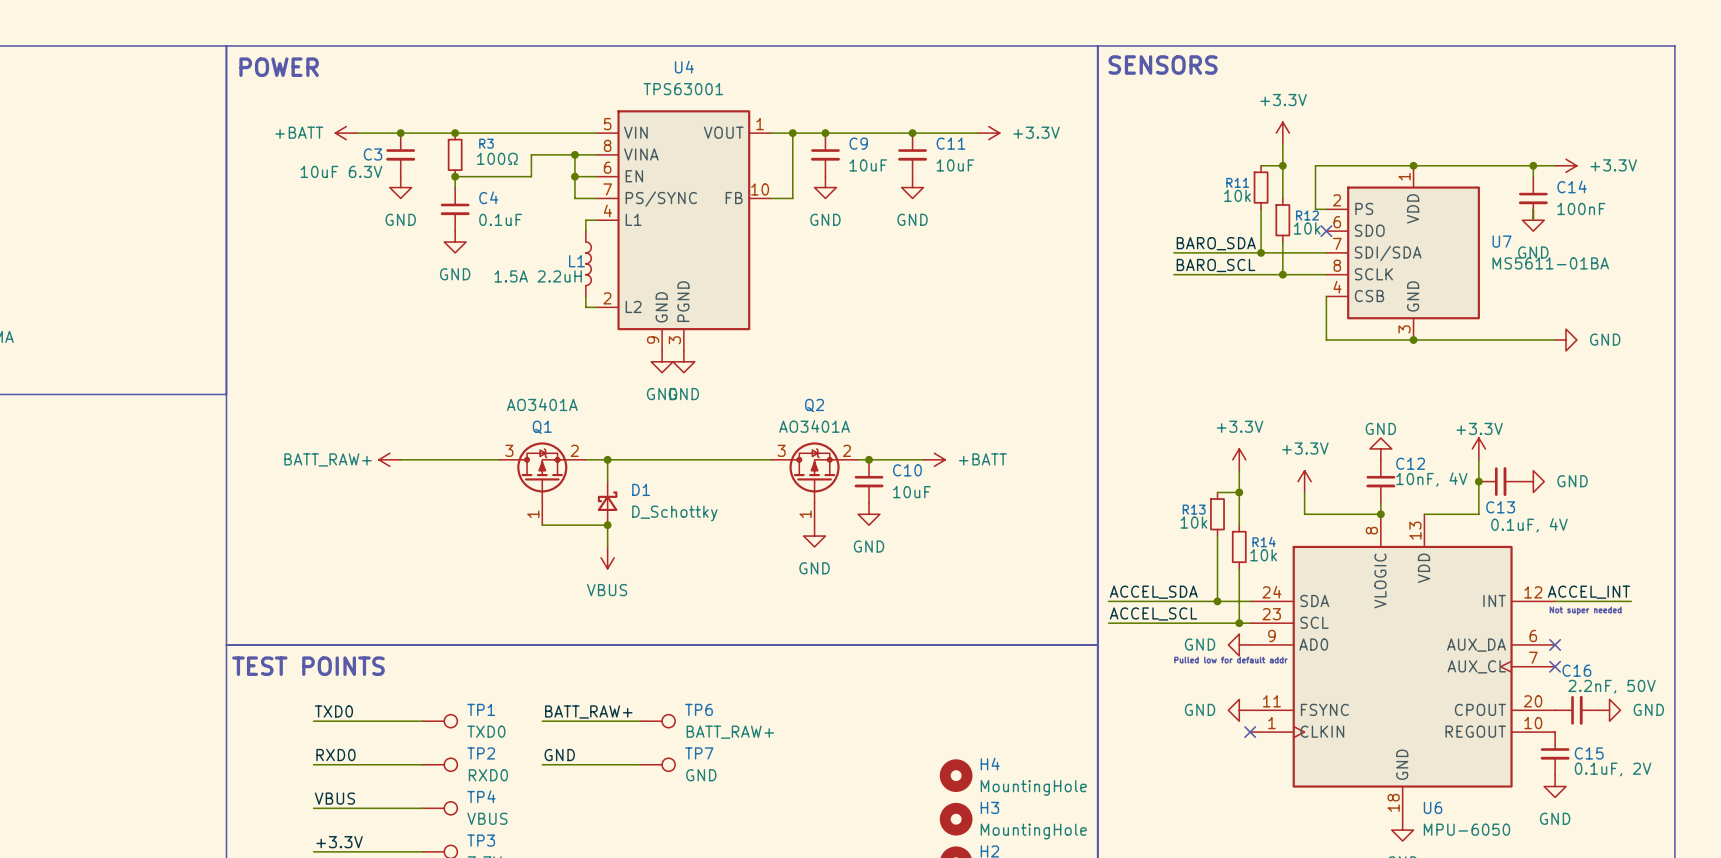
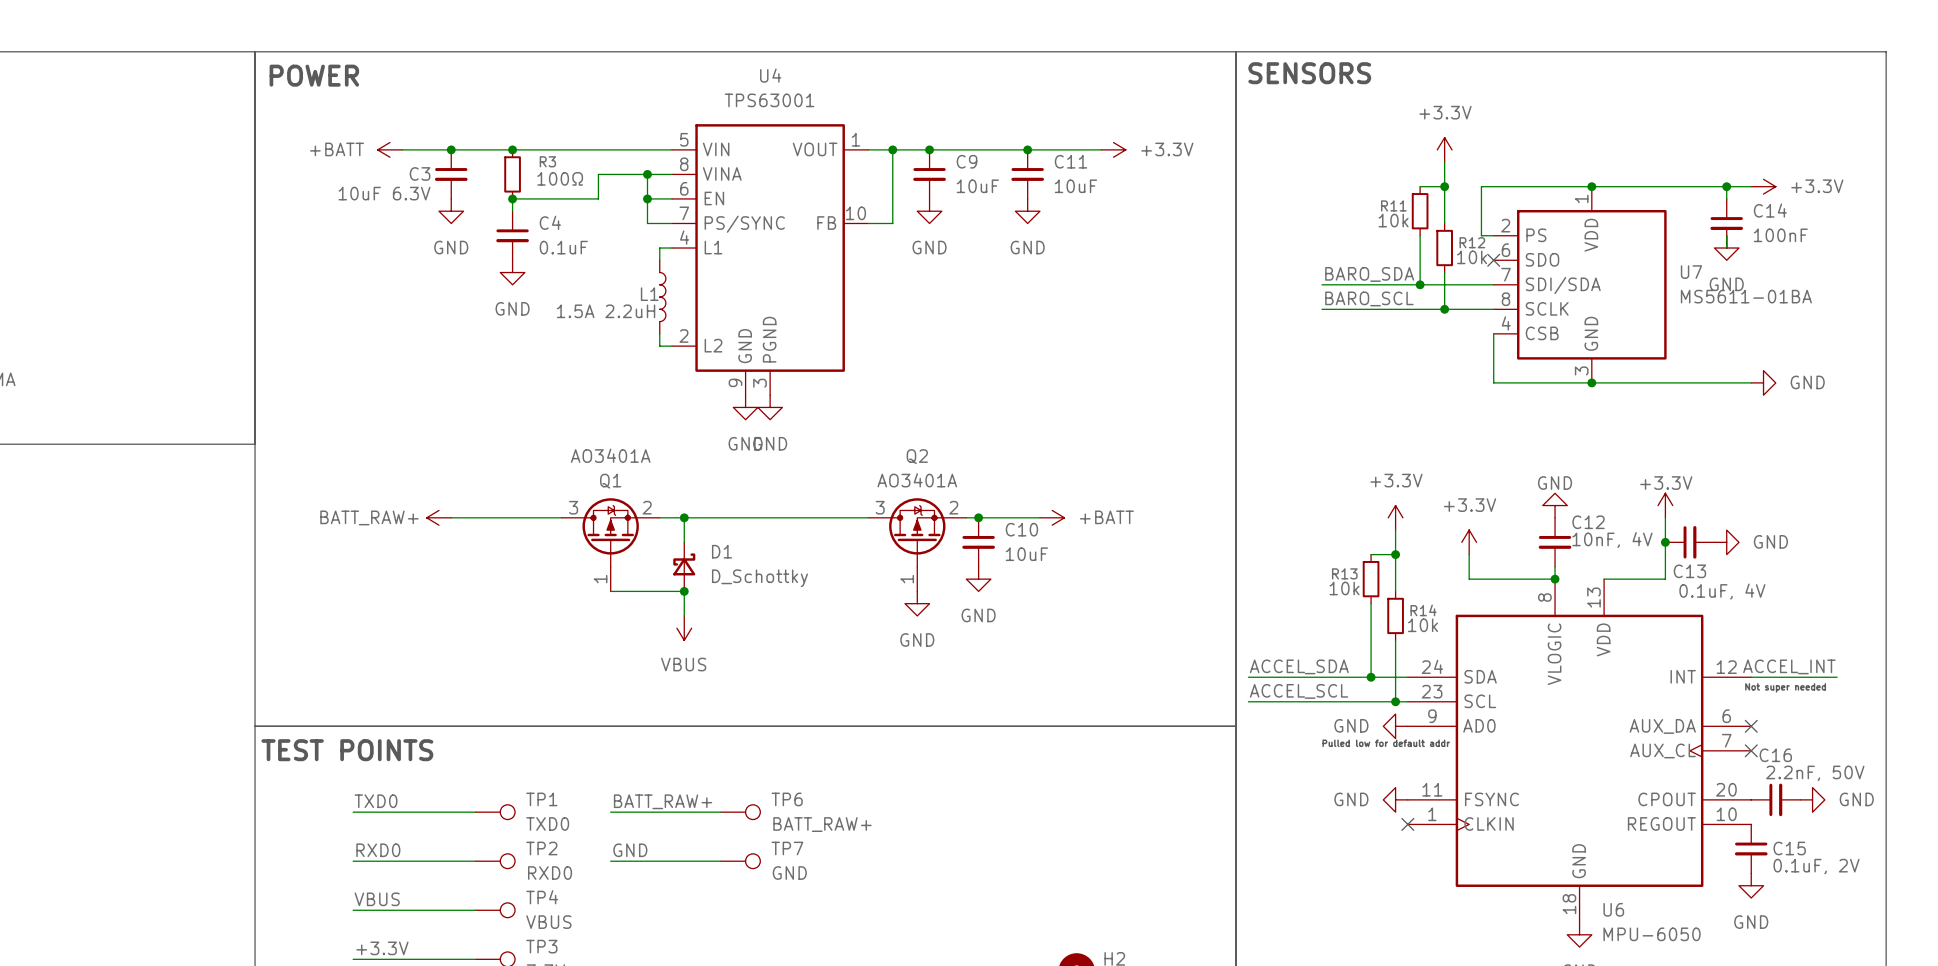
H4: MountingHole (956, 775) -> none
H3: MountingHole (956, 819) -> none

